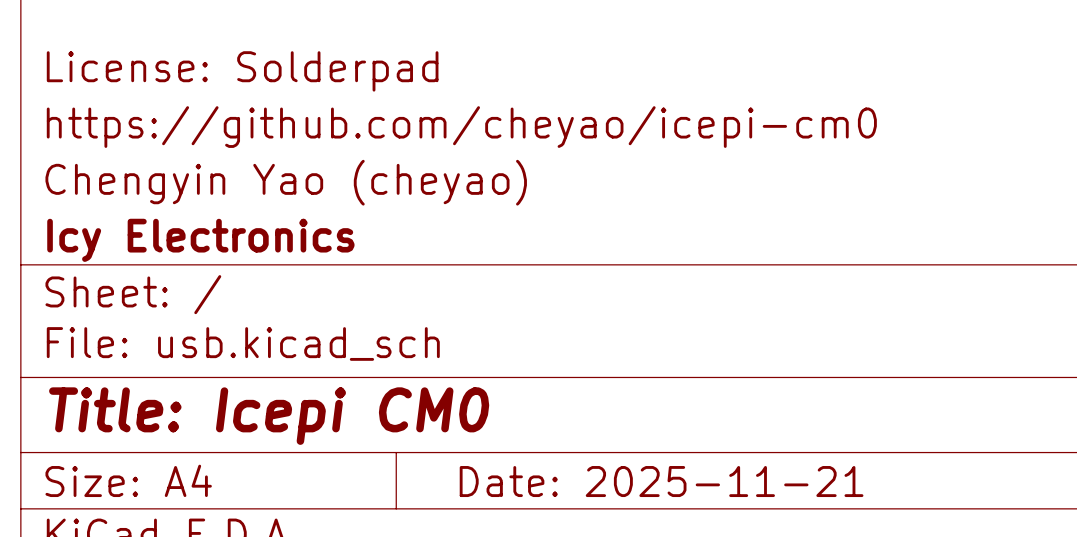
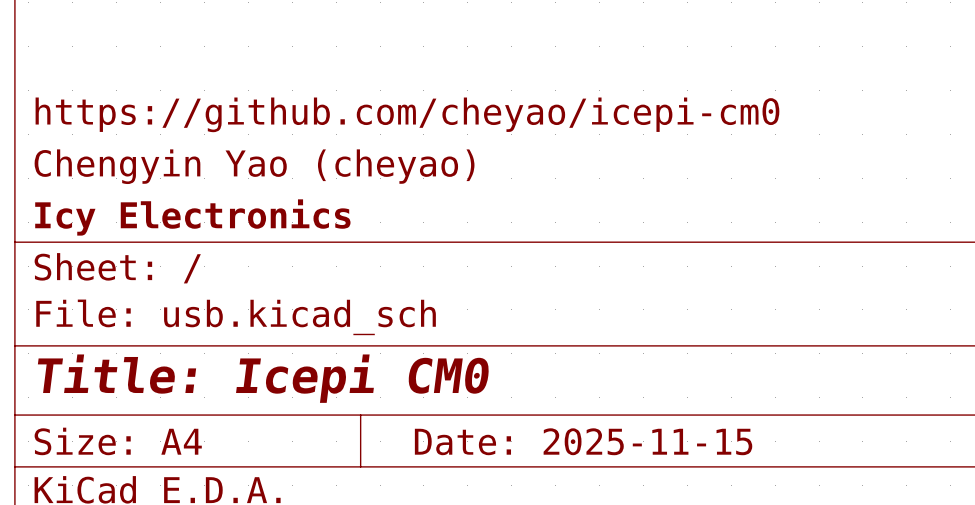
title block: License: Solderpad (242, 71) -> none
title block: Date: 2025-11-21 (661, 481) -> Date: 2025-11-15 (583, 441)

